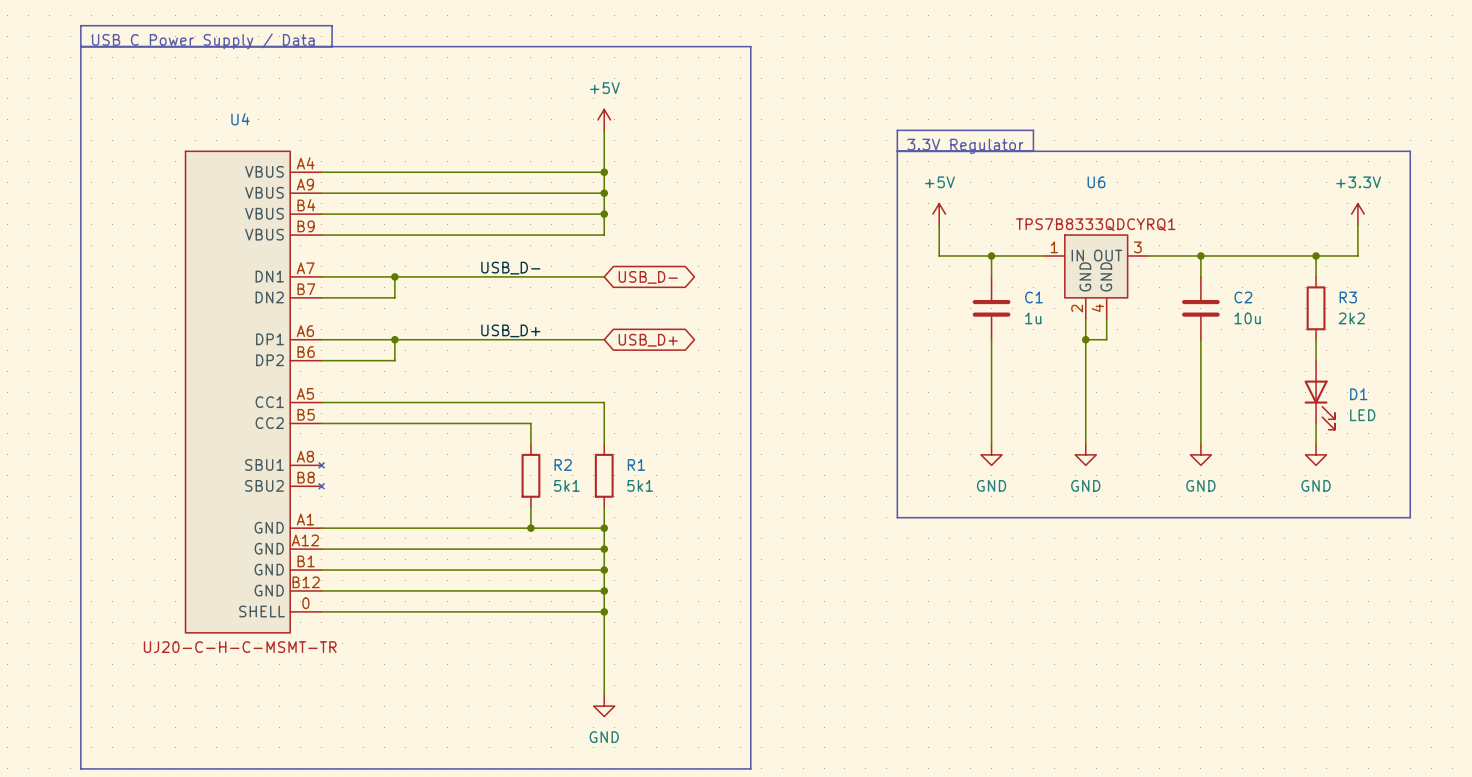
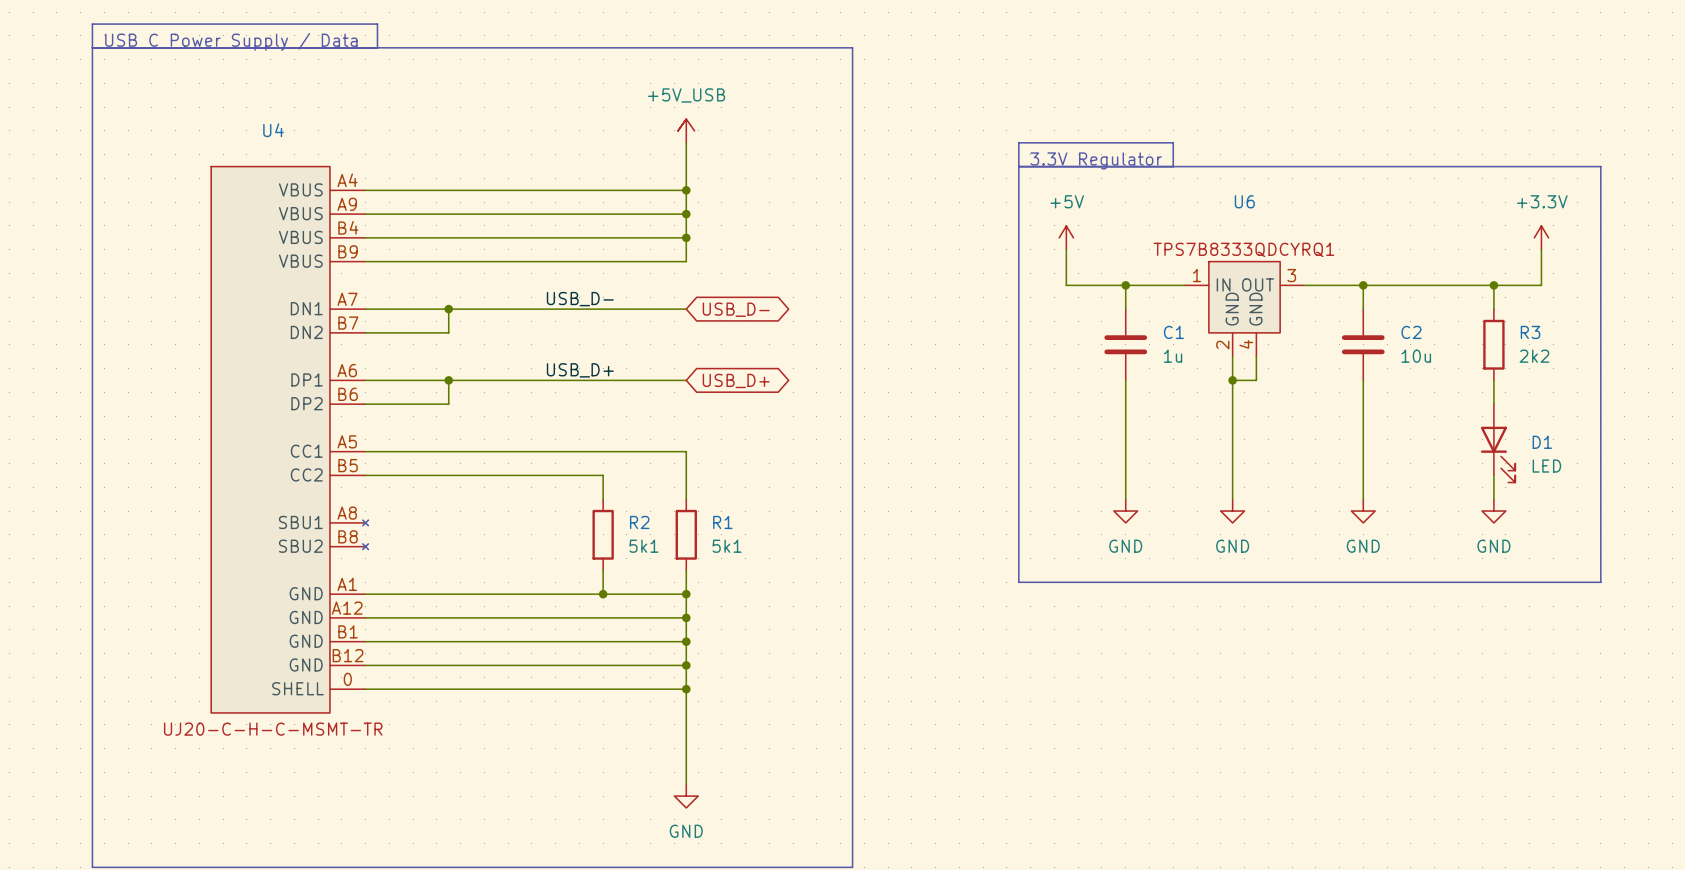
power symbol: +5V (604, 119) -> +5V_USB (686, 130)

